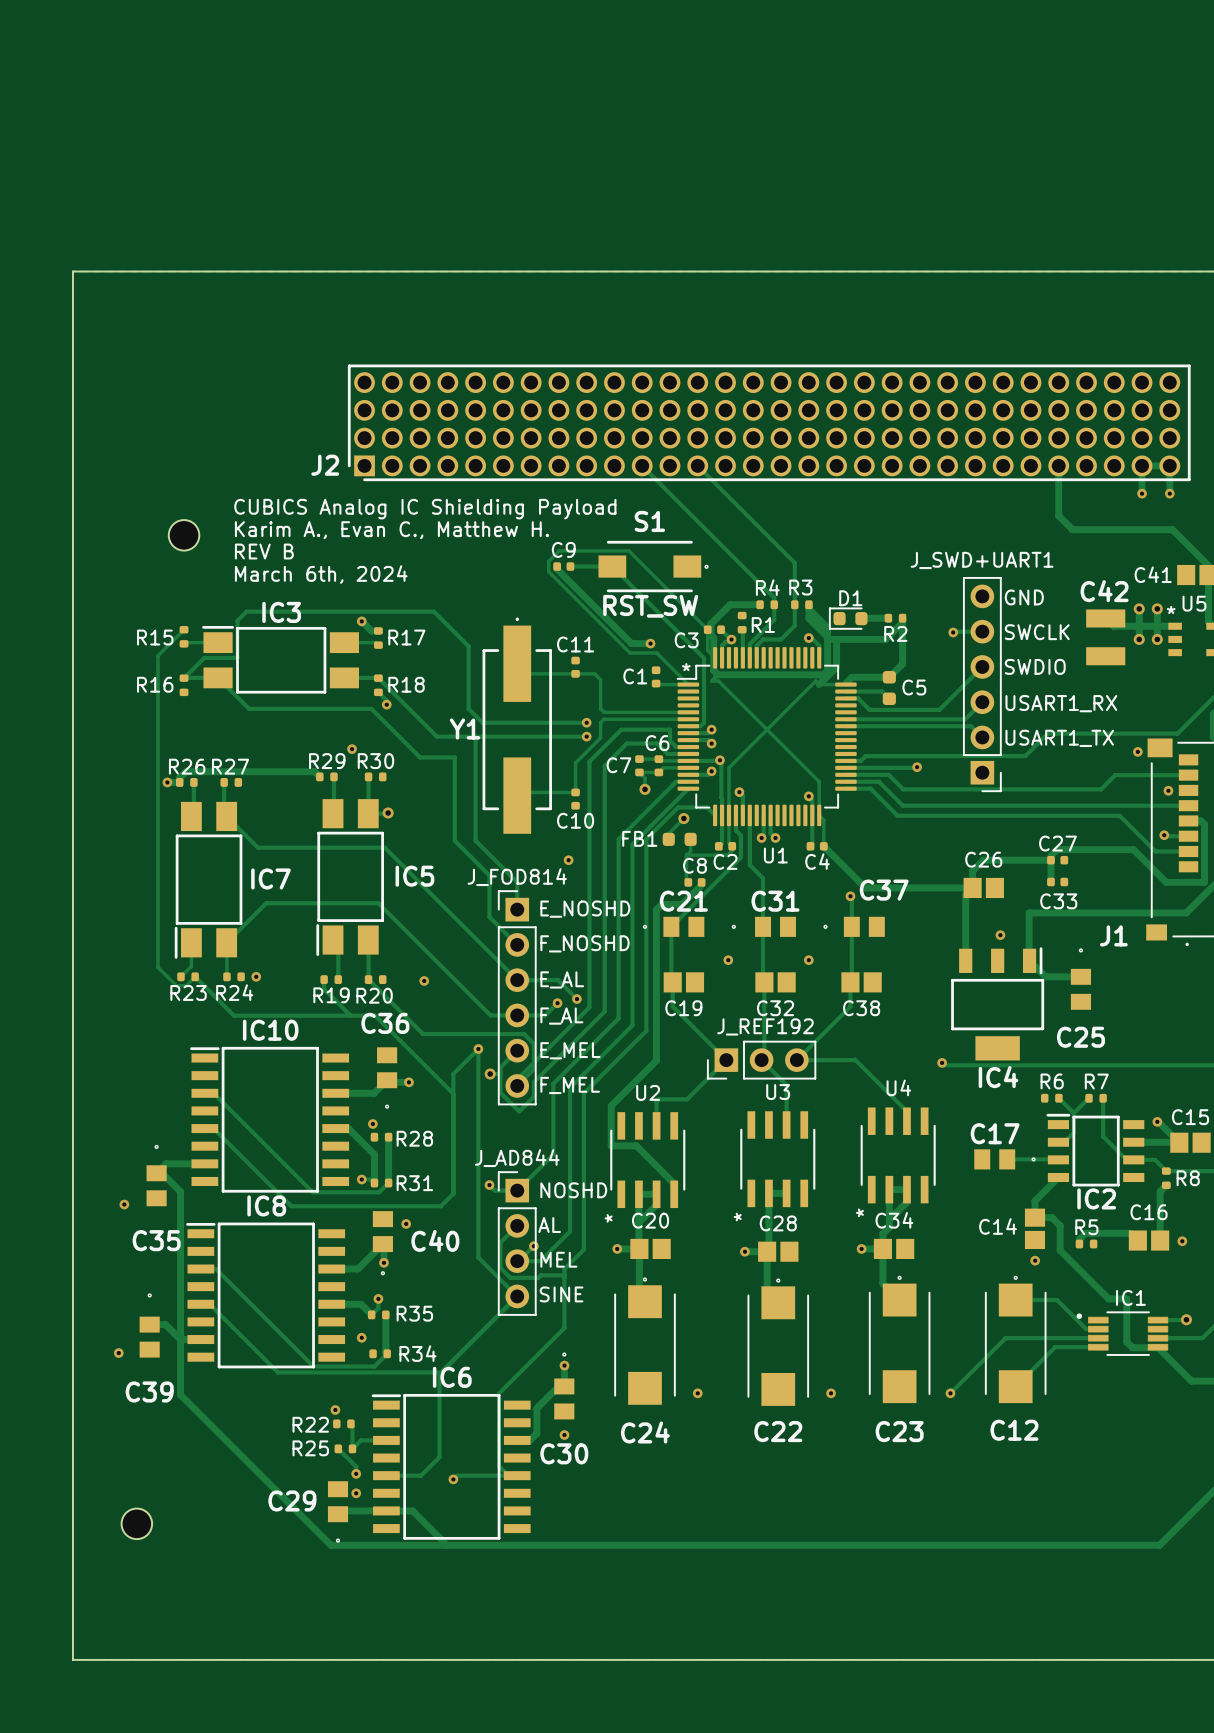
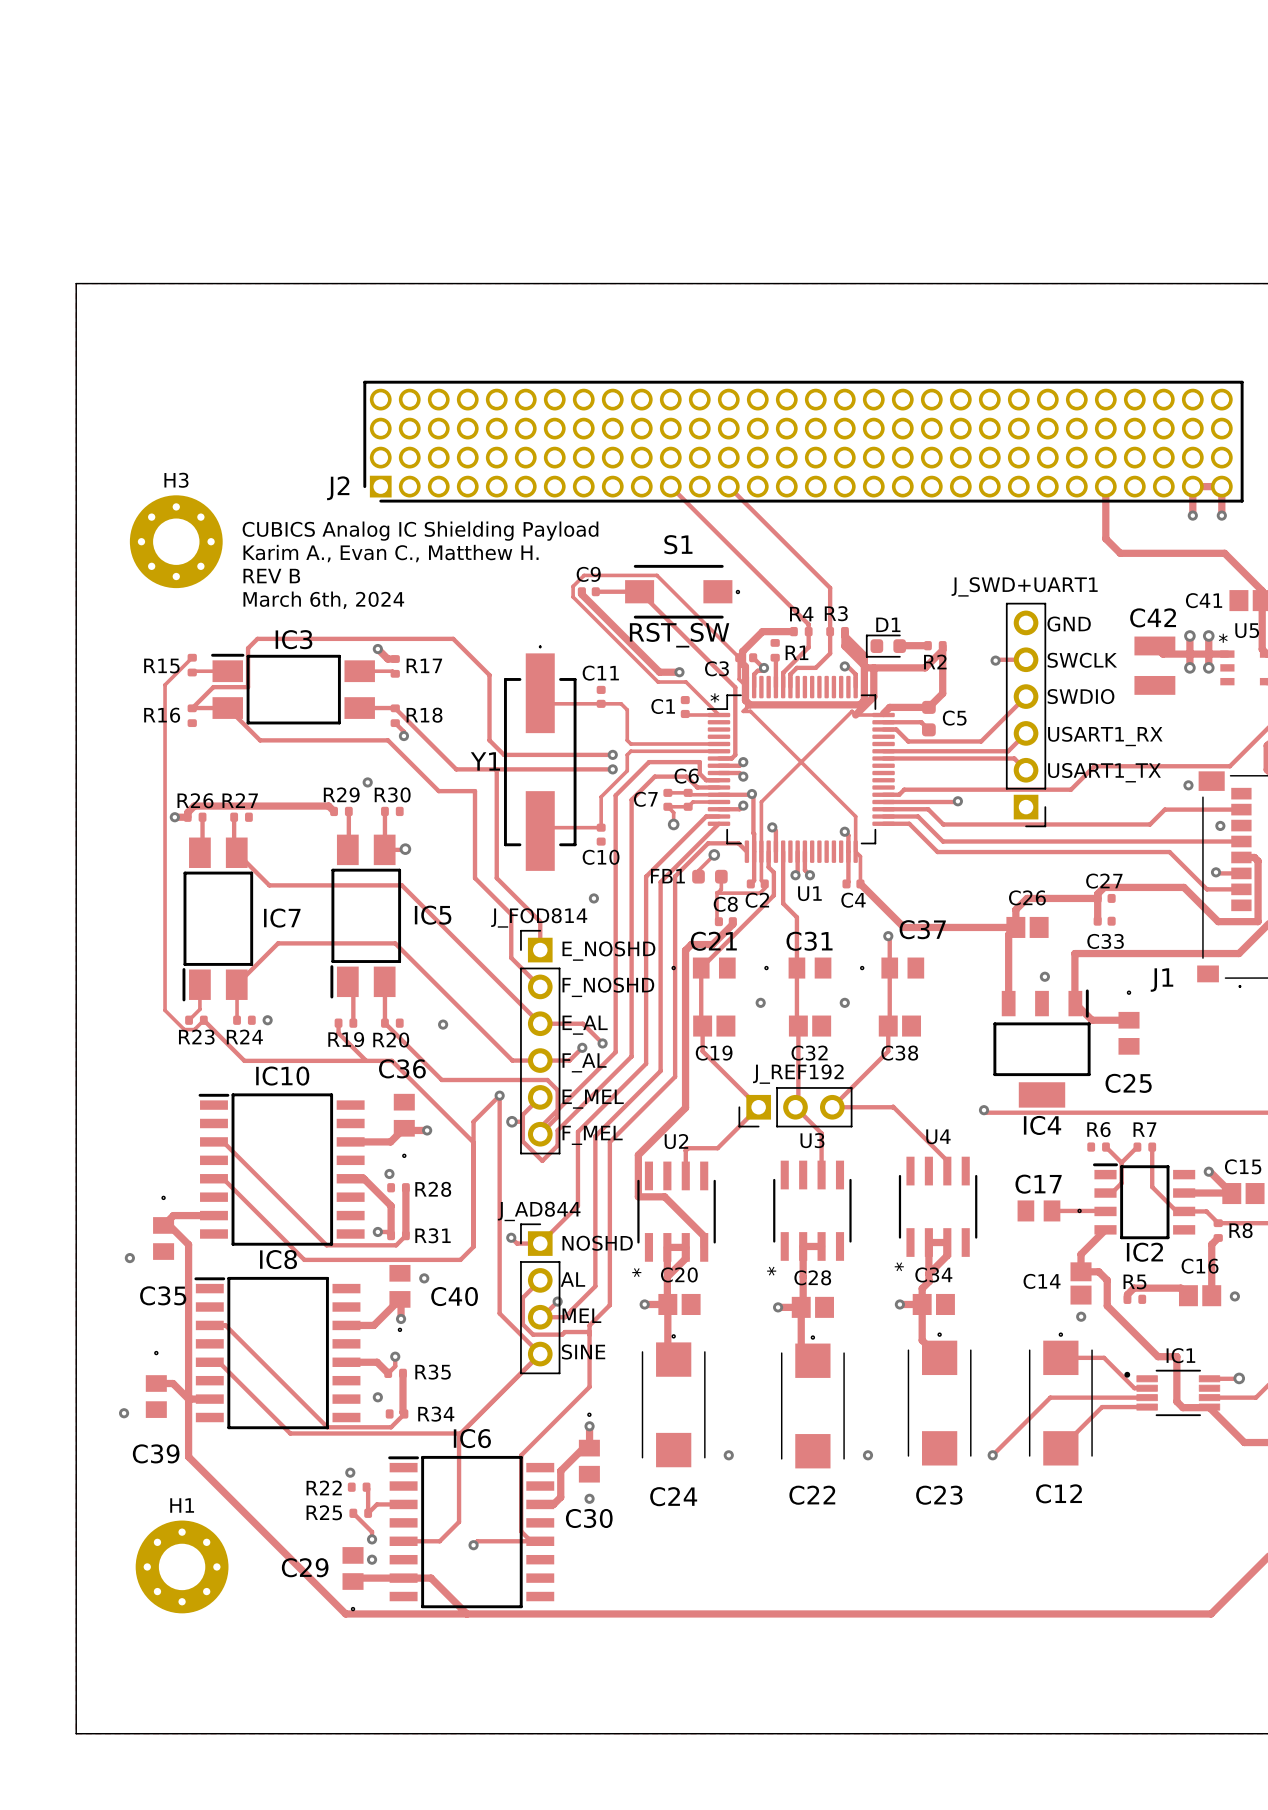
H3: none -> (176, 541)
part: (184, 535) -> none
H1: none -> (182, 1566)
part: (136, 1523) -> none

